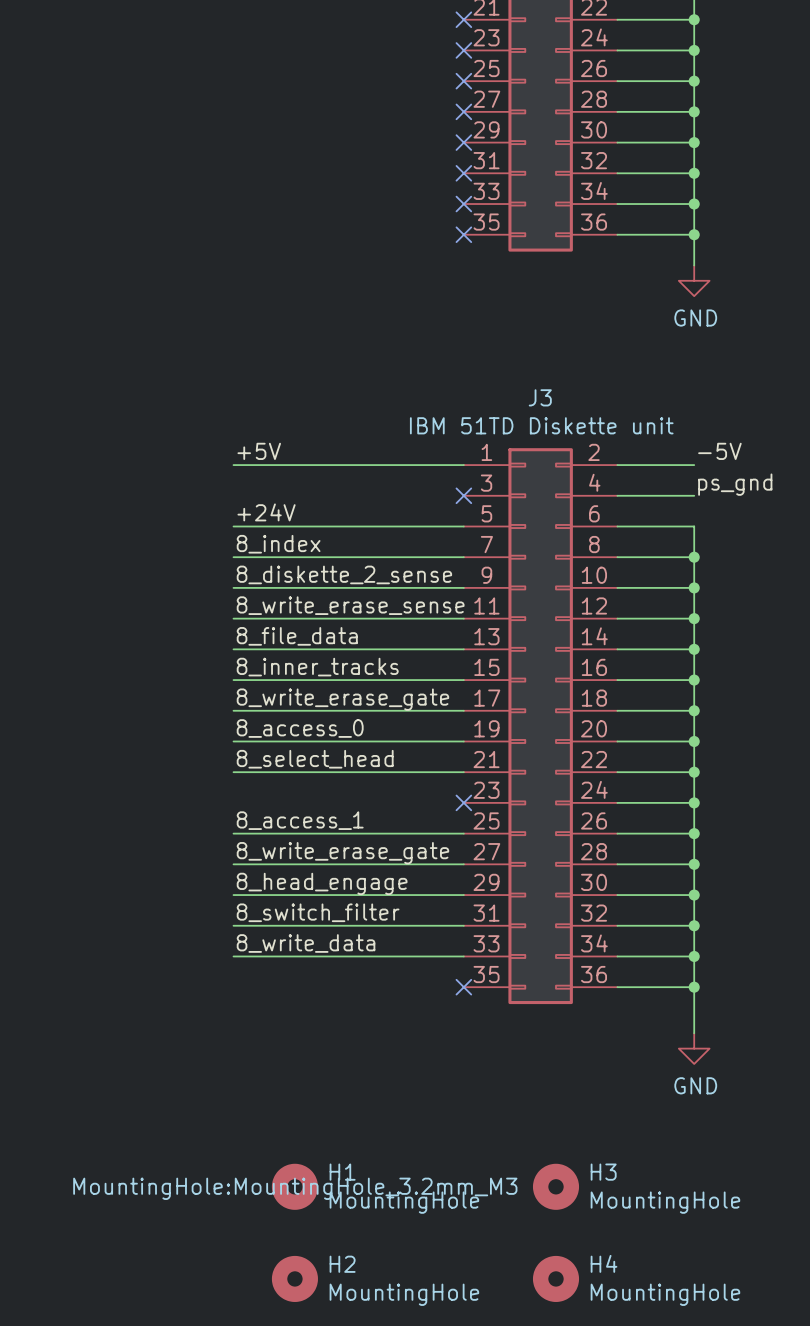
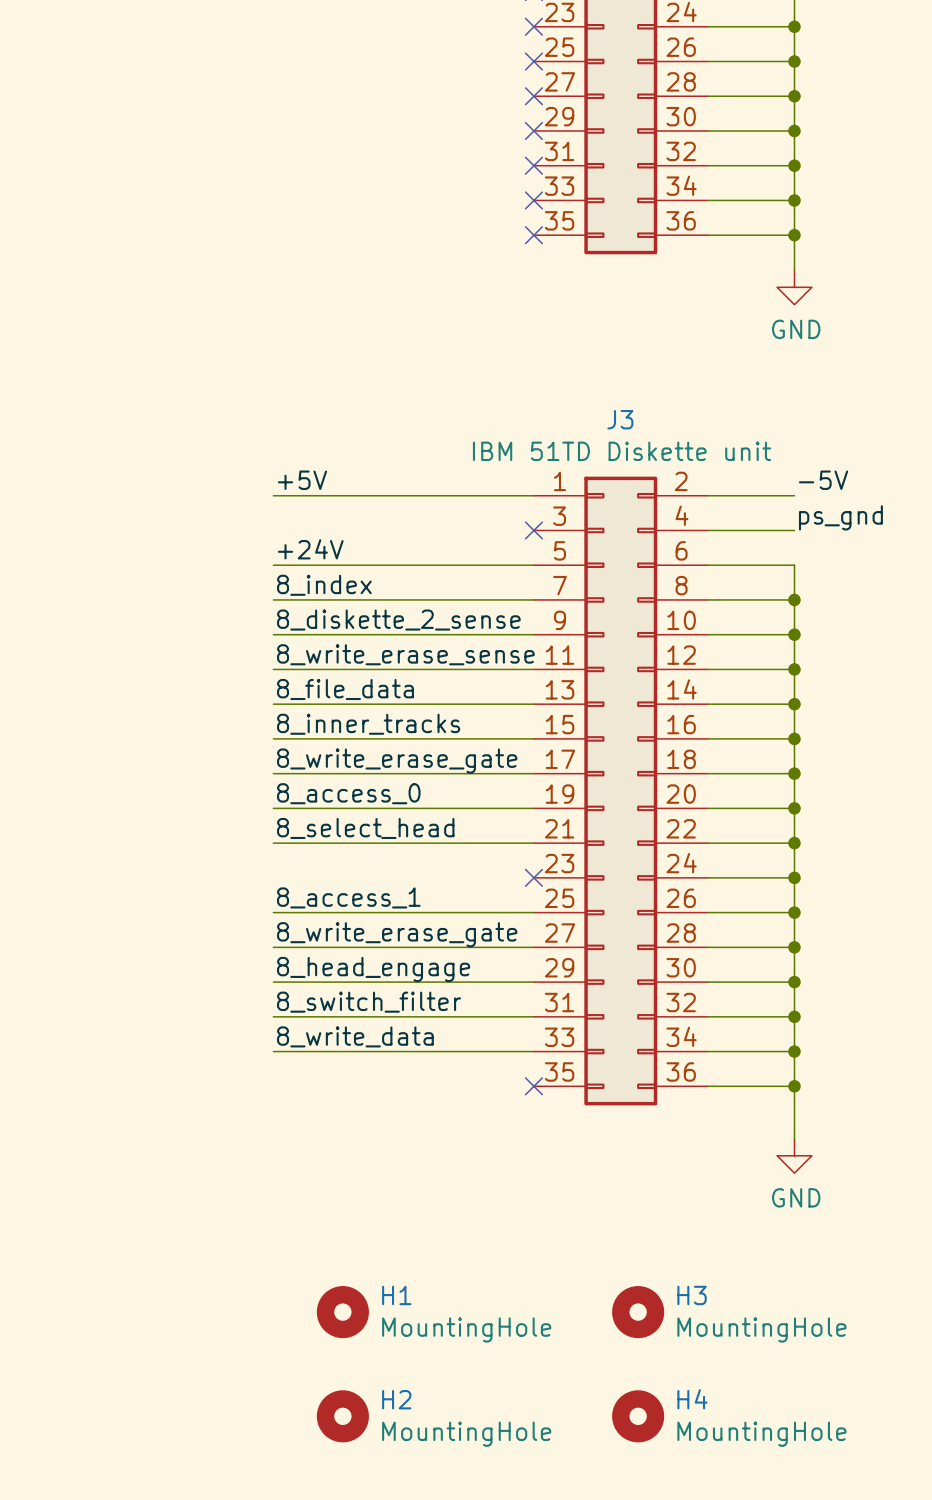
H1 text: MountingHole:MountingHole_3.2mm_M3 (295, 1188) -> none

